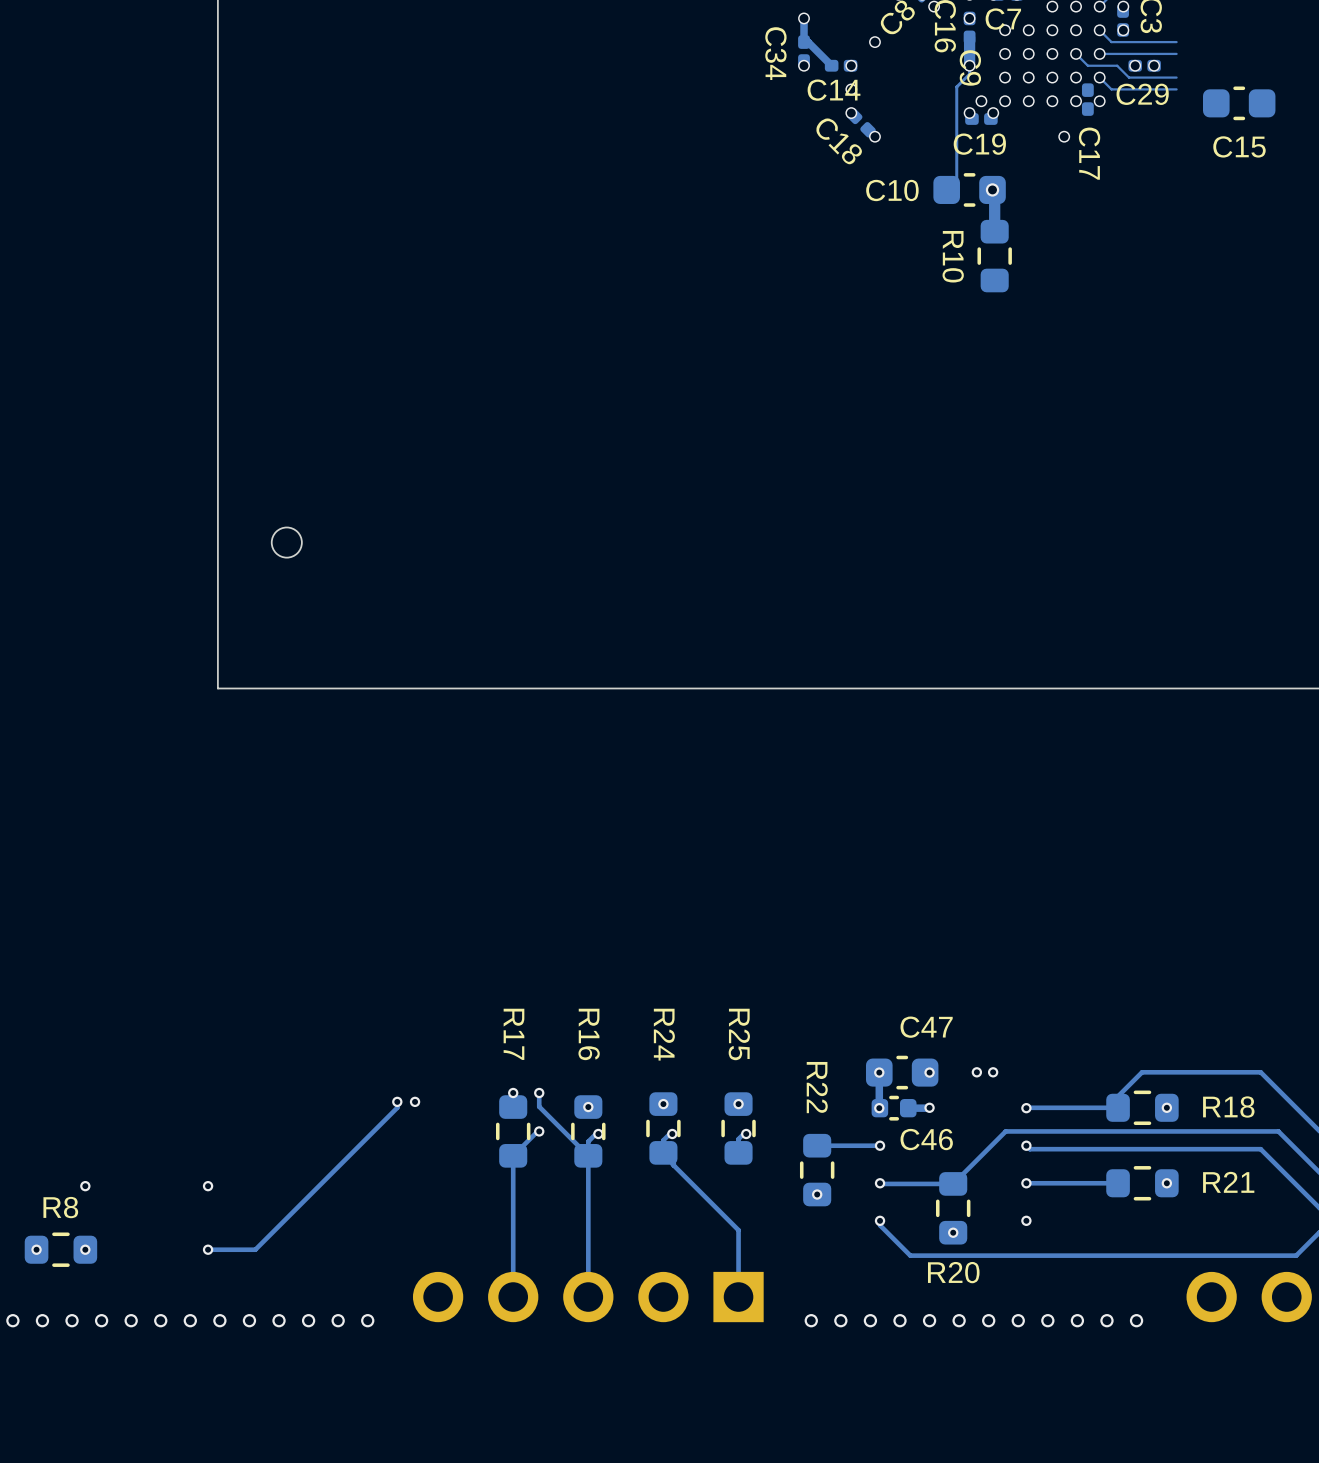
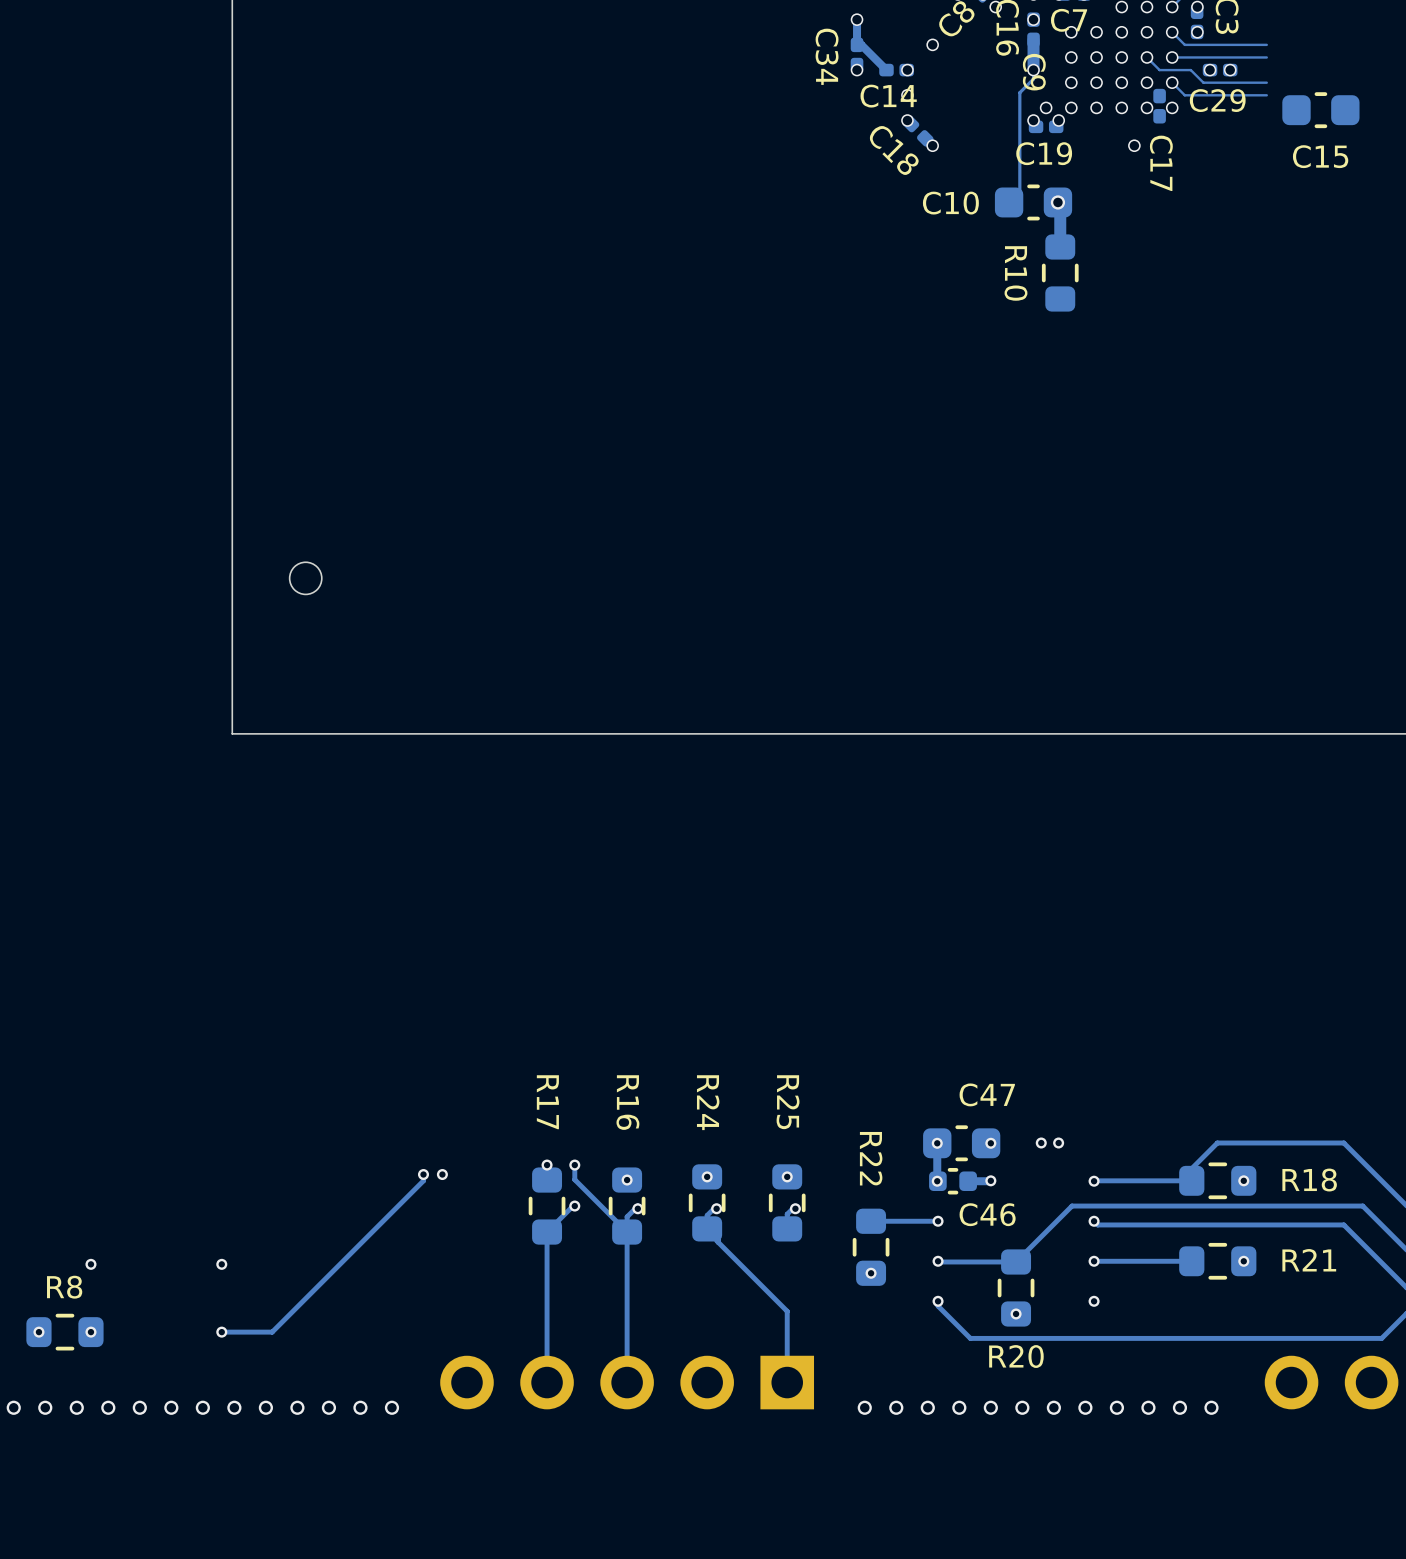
track: none -> (1266, 44) (1254, 44)
track: none -> (1266, 57) (1254, 57)
track: none -> (1266, 82) (1254, 82)
track: none -> (1266, 95) (1254, 95)

